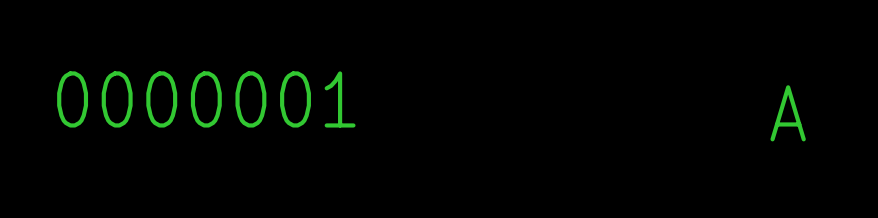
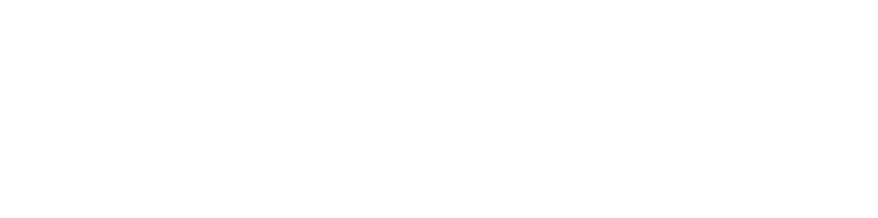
text: 0000001 (206, 99) -> none
text: A (788, 113) -> none

